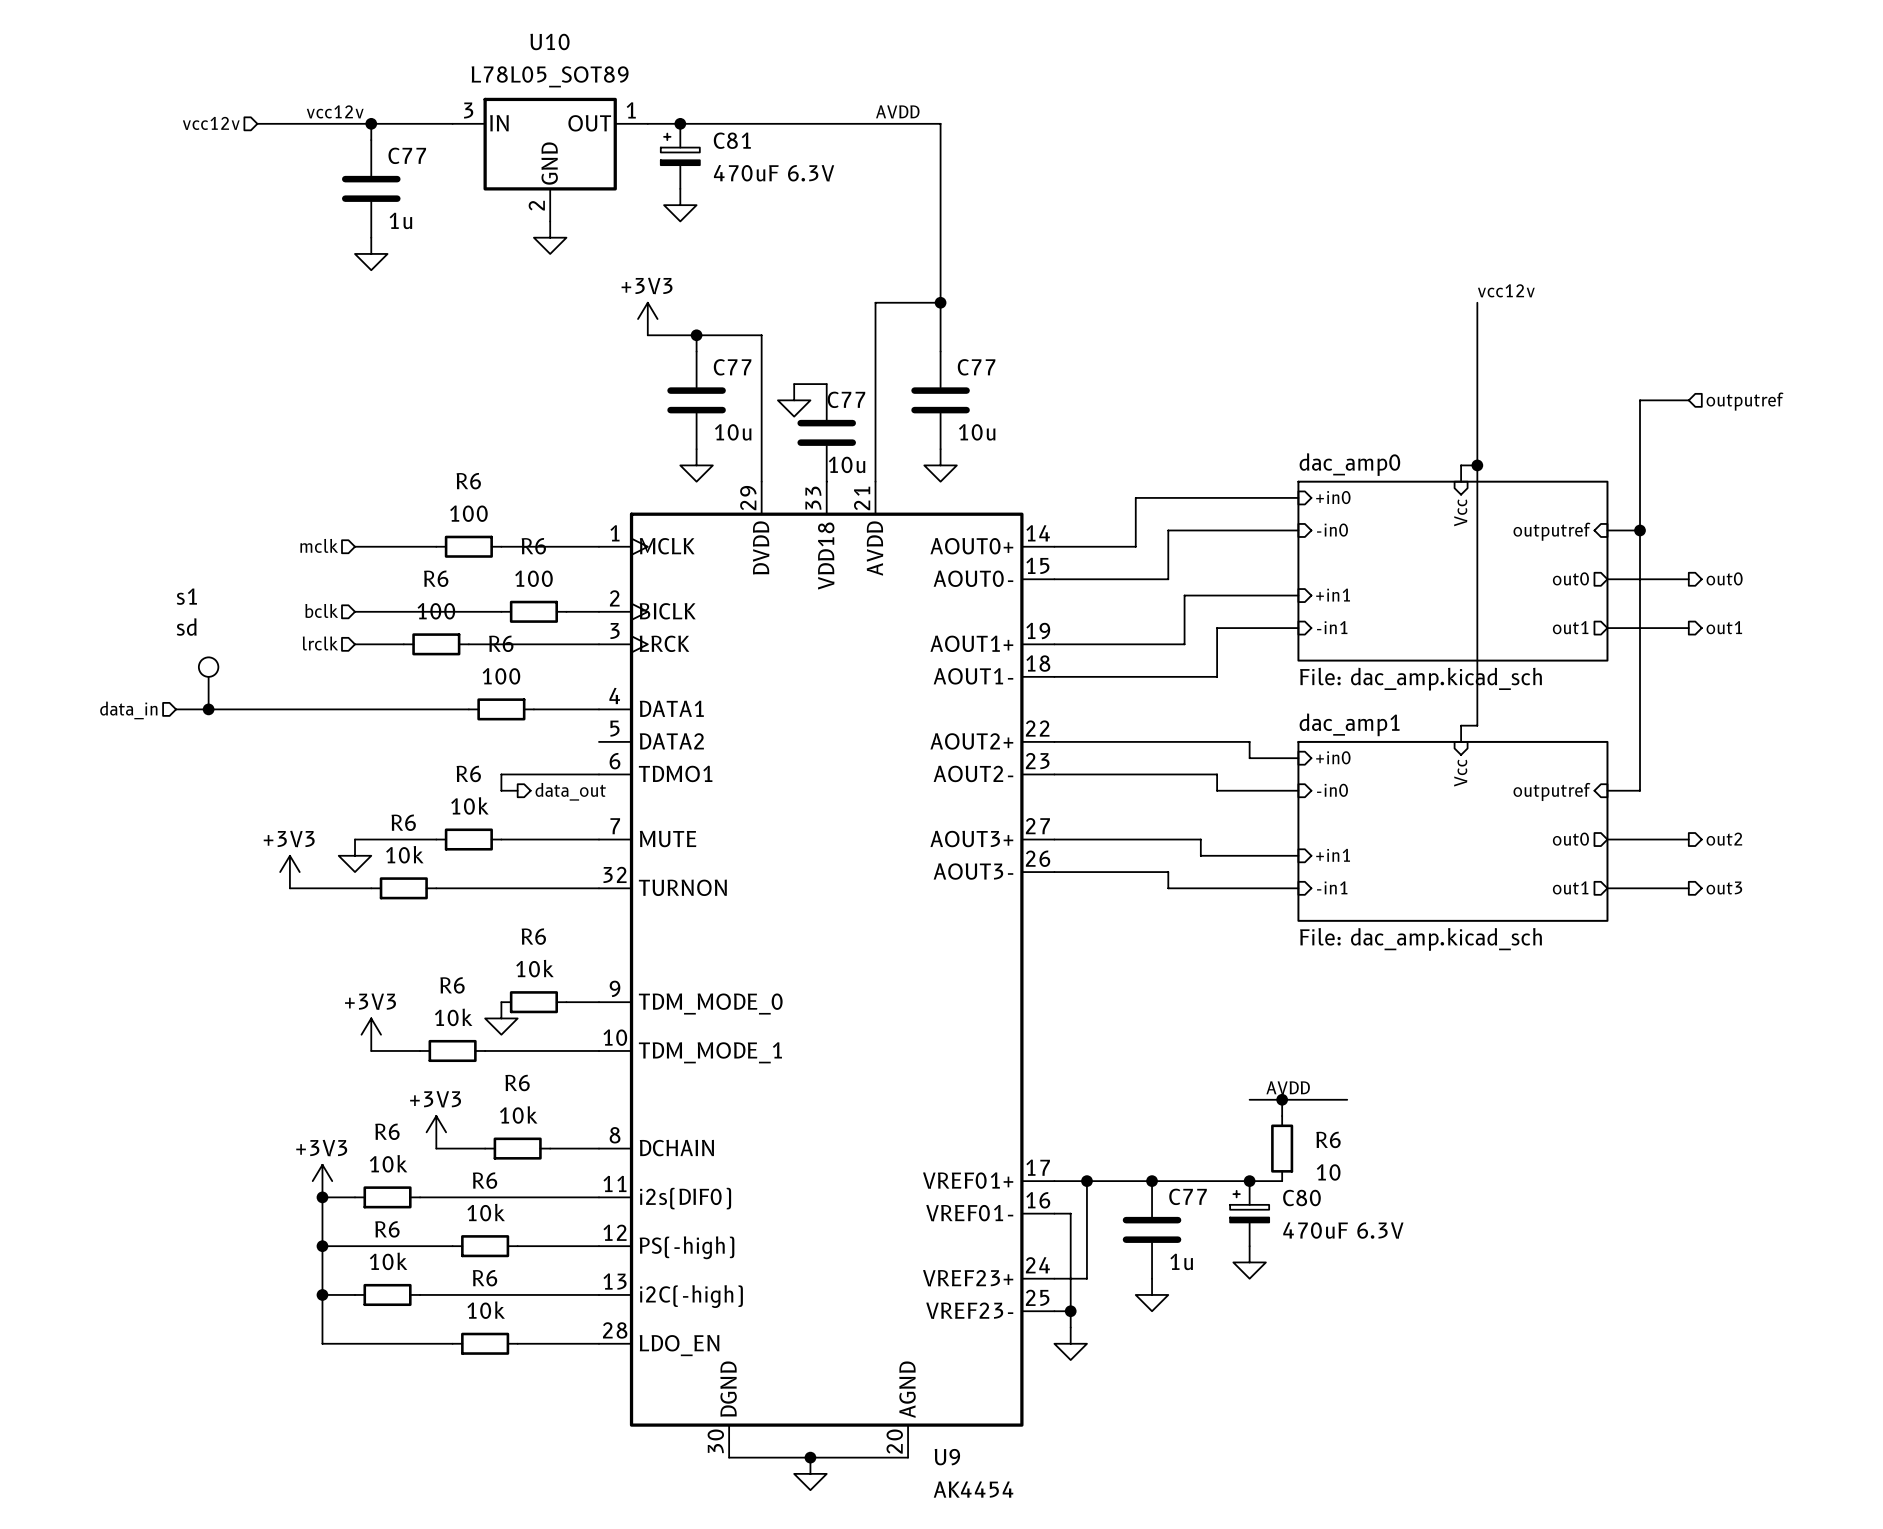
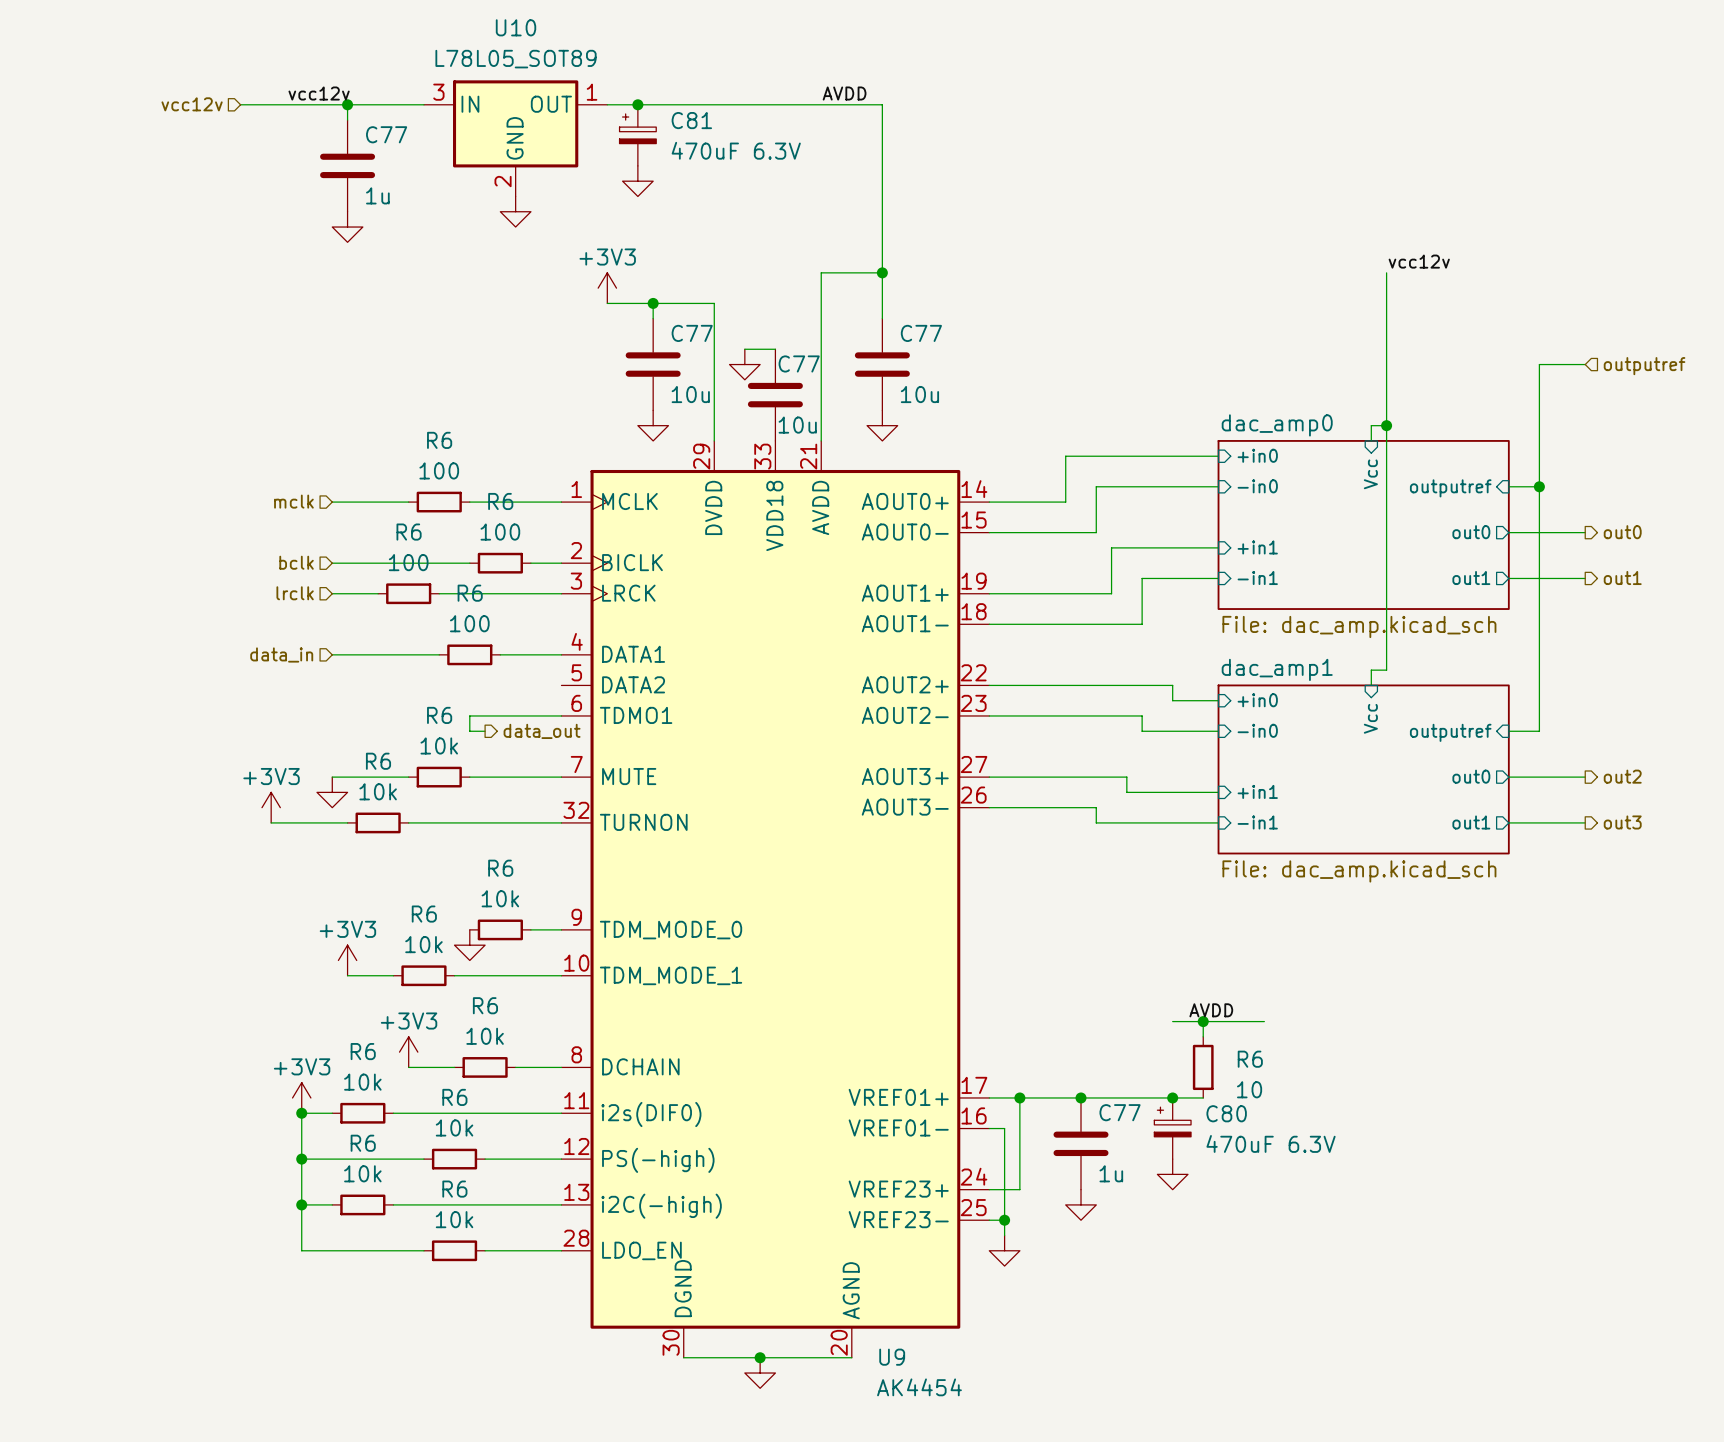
s1: sd (208, 683) -> none
wire: (176, 709) (355, 709) -> none
junction: (208, 709) -> none
hierarchical label position: data_in (128, 710) -> data_in (281, 654)

